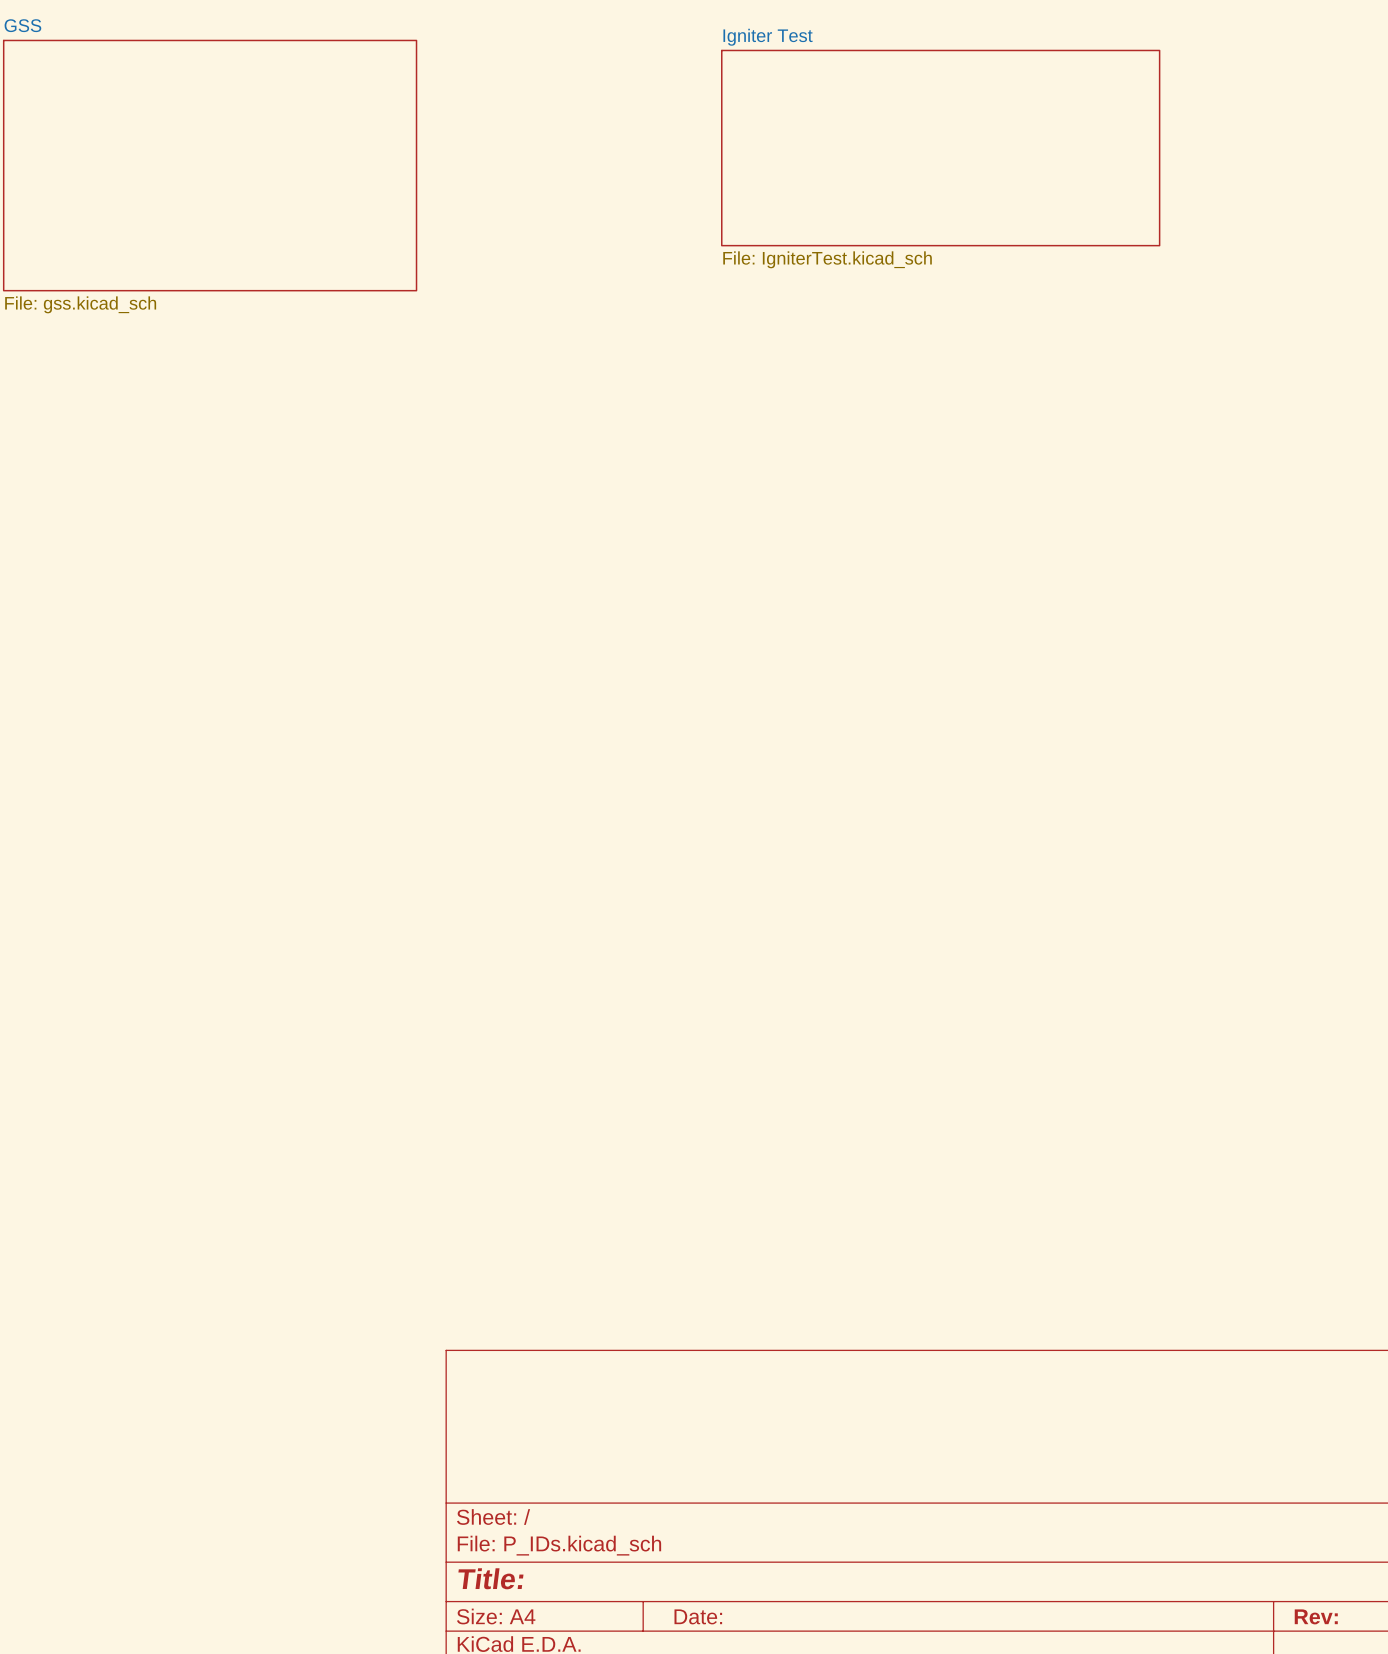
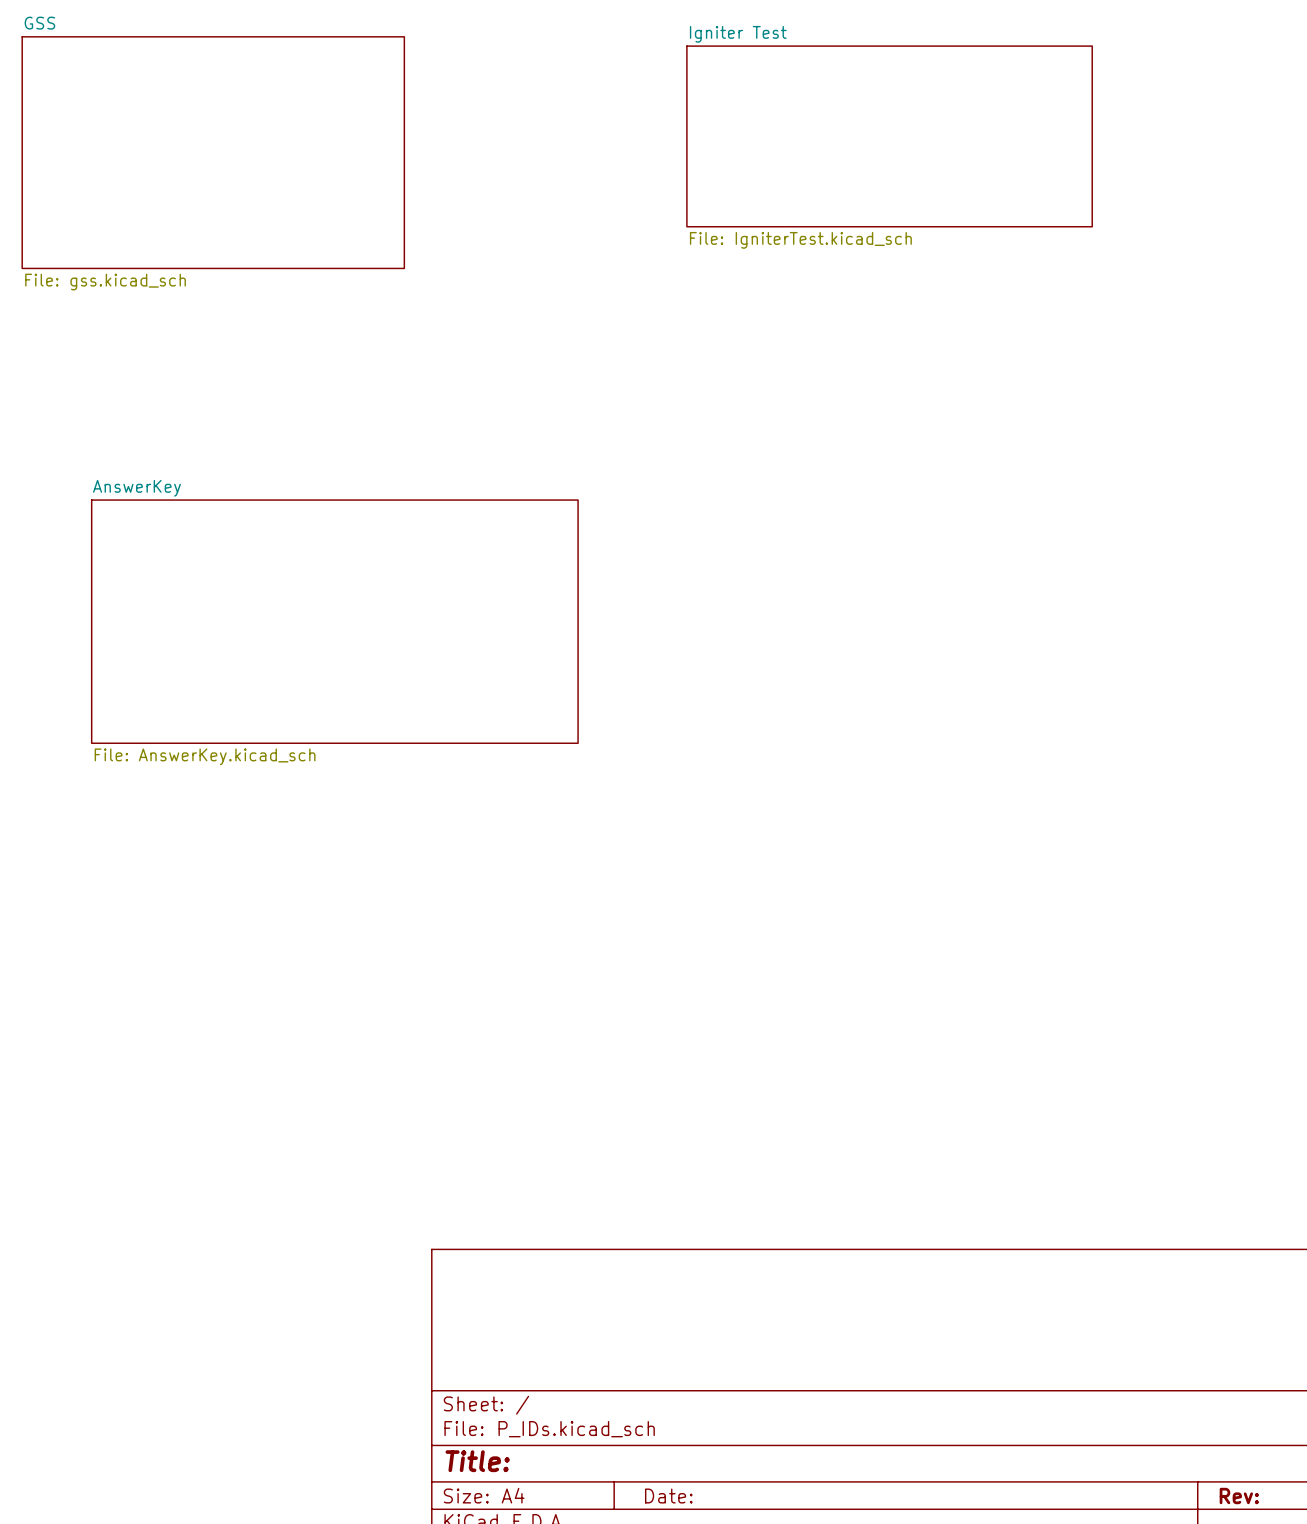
sheet AnswerKey: none -> File: AnswerKey.kicad_sch (334, 621)

